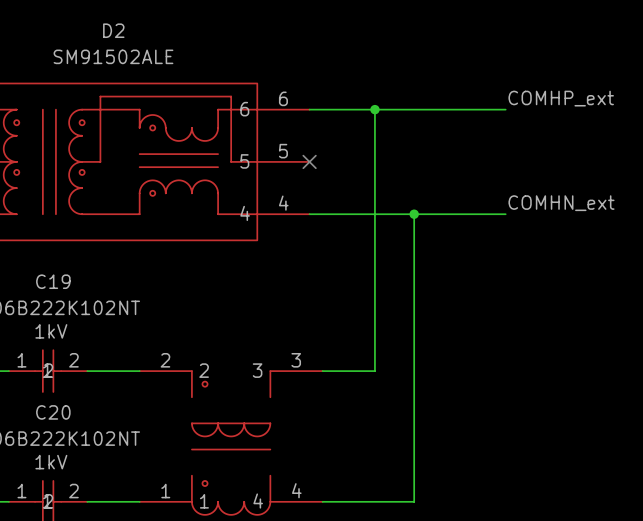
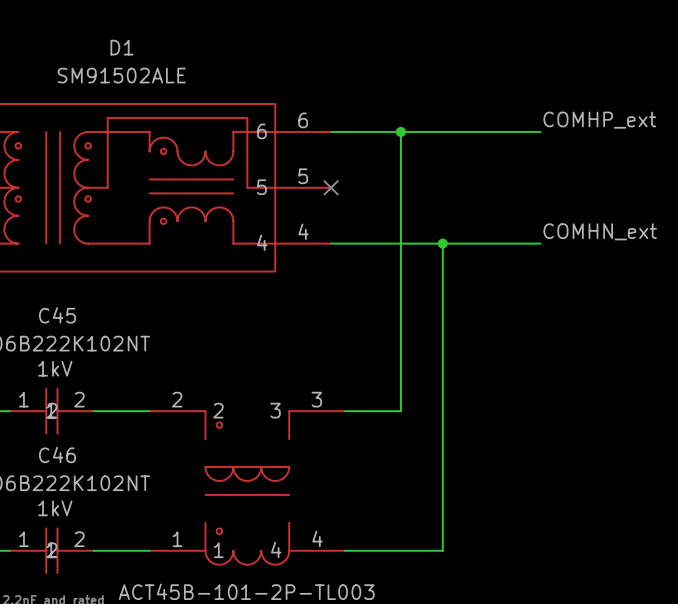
D2 name: D2 (113, 30) -> D1 (122, 47)
C19 name: C19 (53, 281) -> C45 (57, 315)
C20 name: C20 (53, 412) -> C46 (57, 454)

